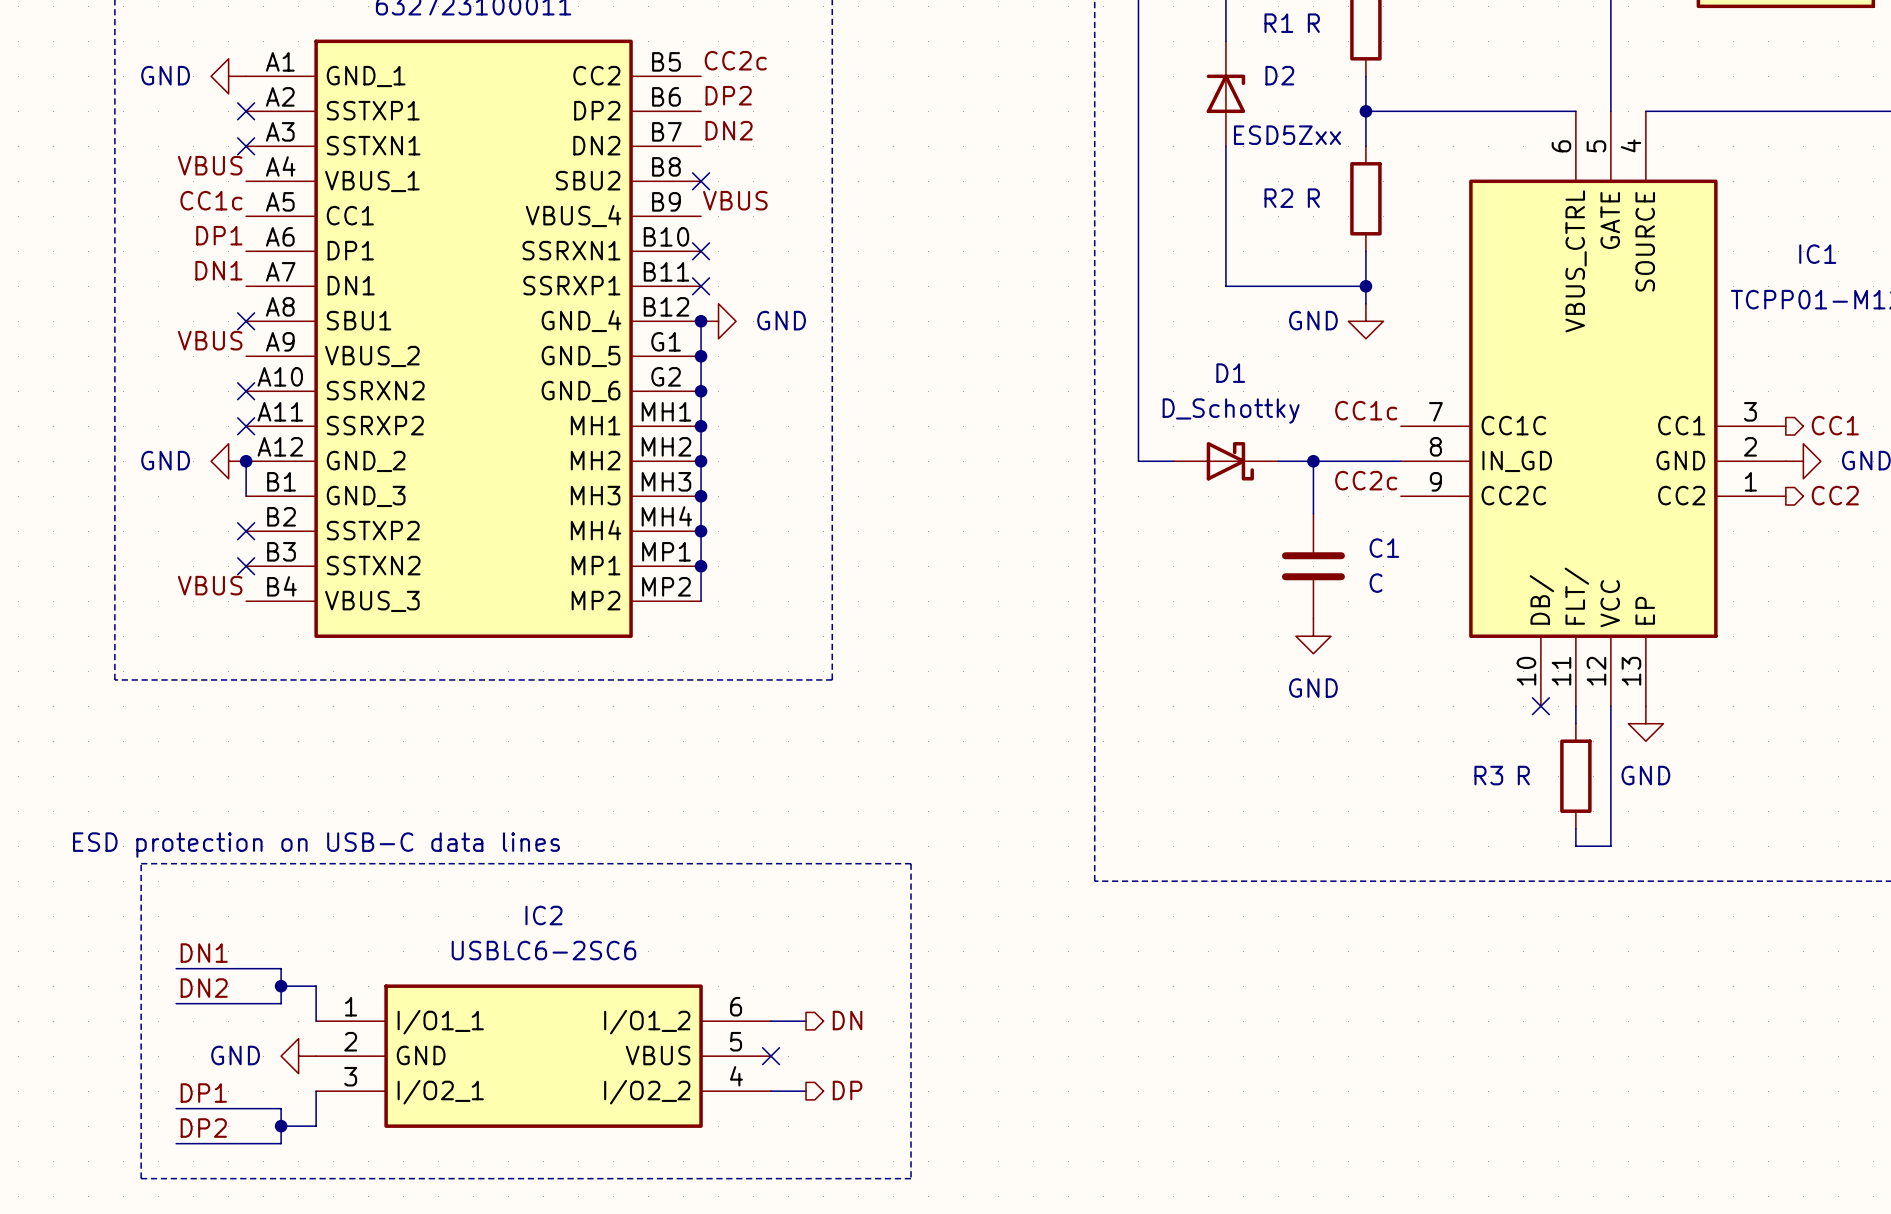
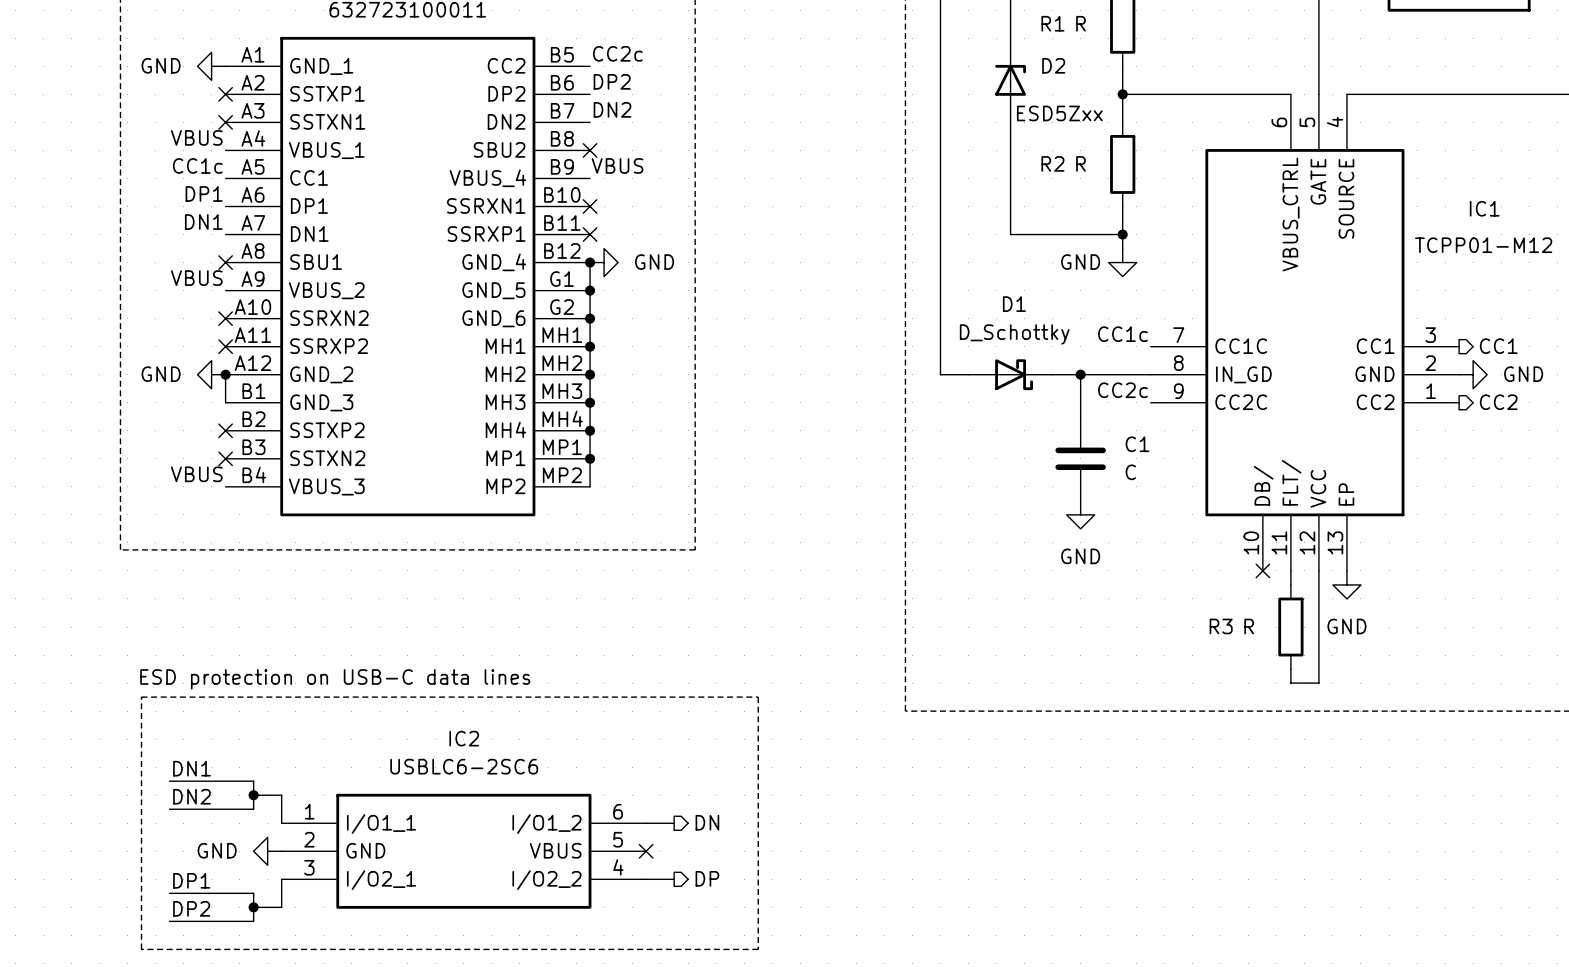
text position: ESD protection on USB-C data lines (316, 845) -> ESD protection on USB-C data lines (335, 679)

